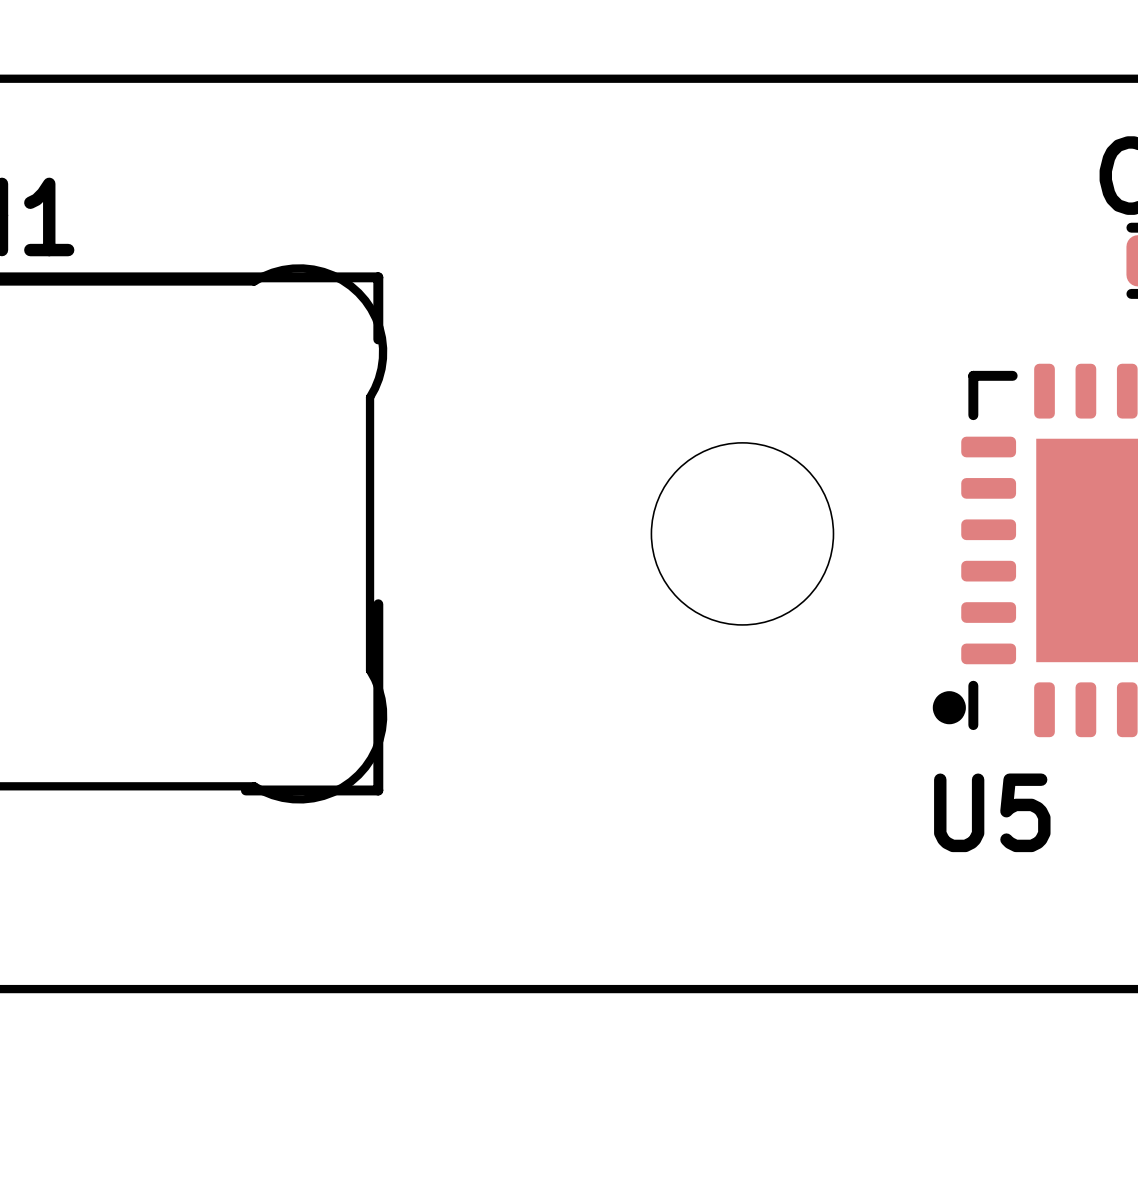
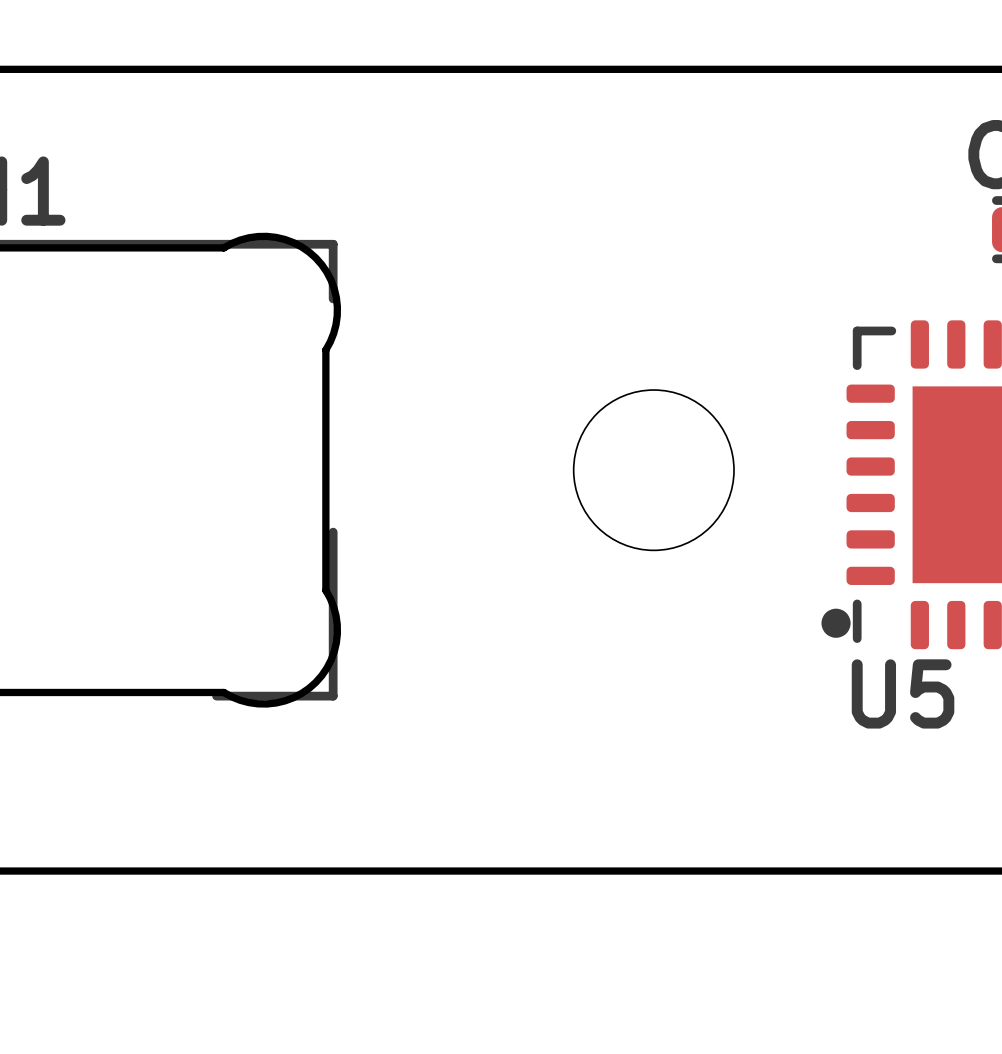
U5 name position: U5 (992, 812) -> U5 (903, 693)

